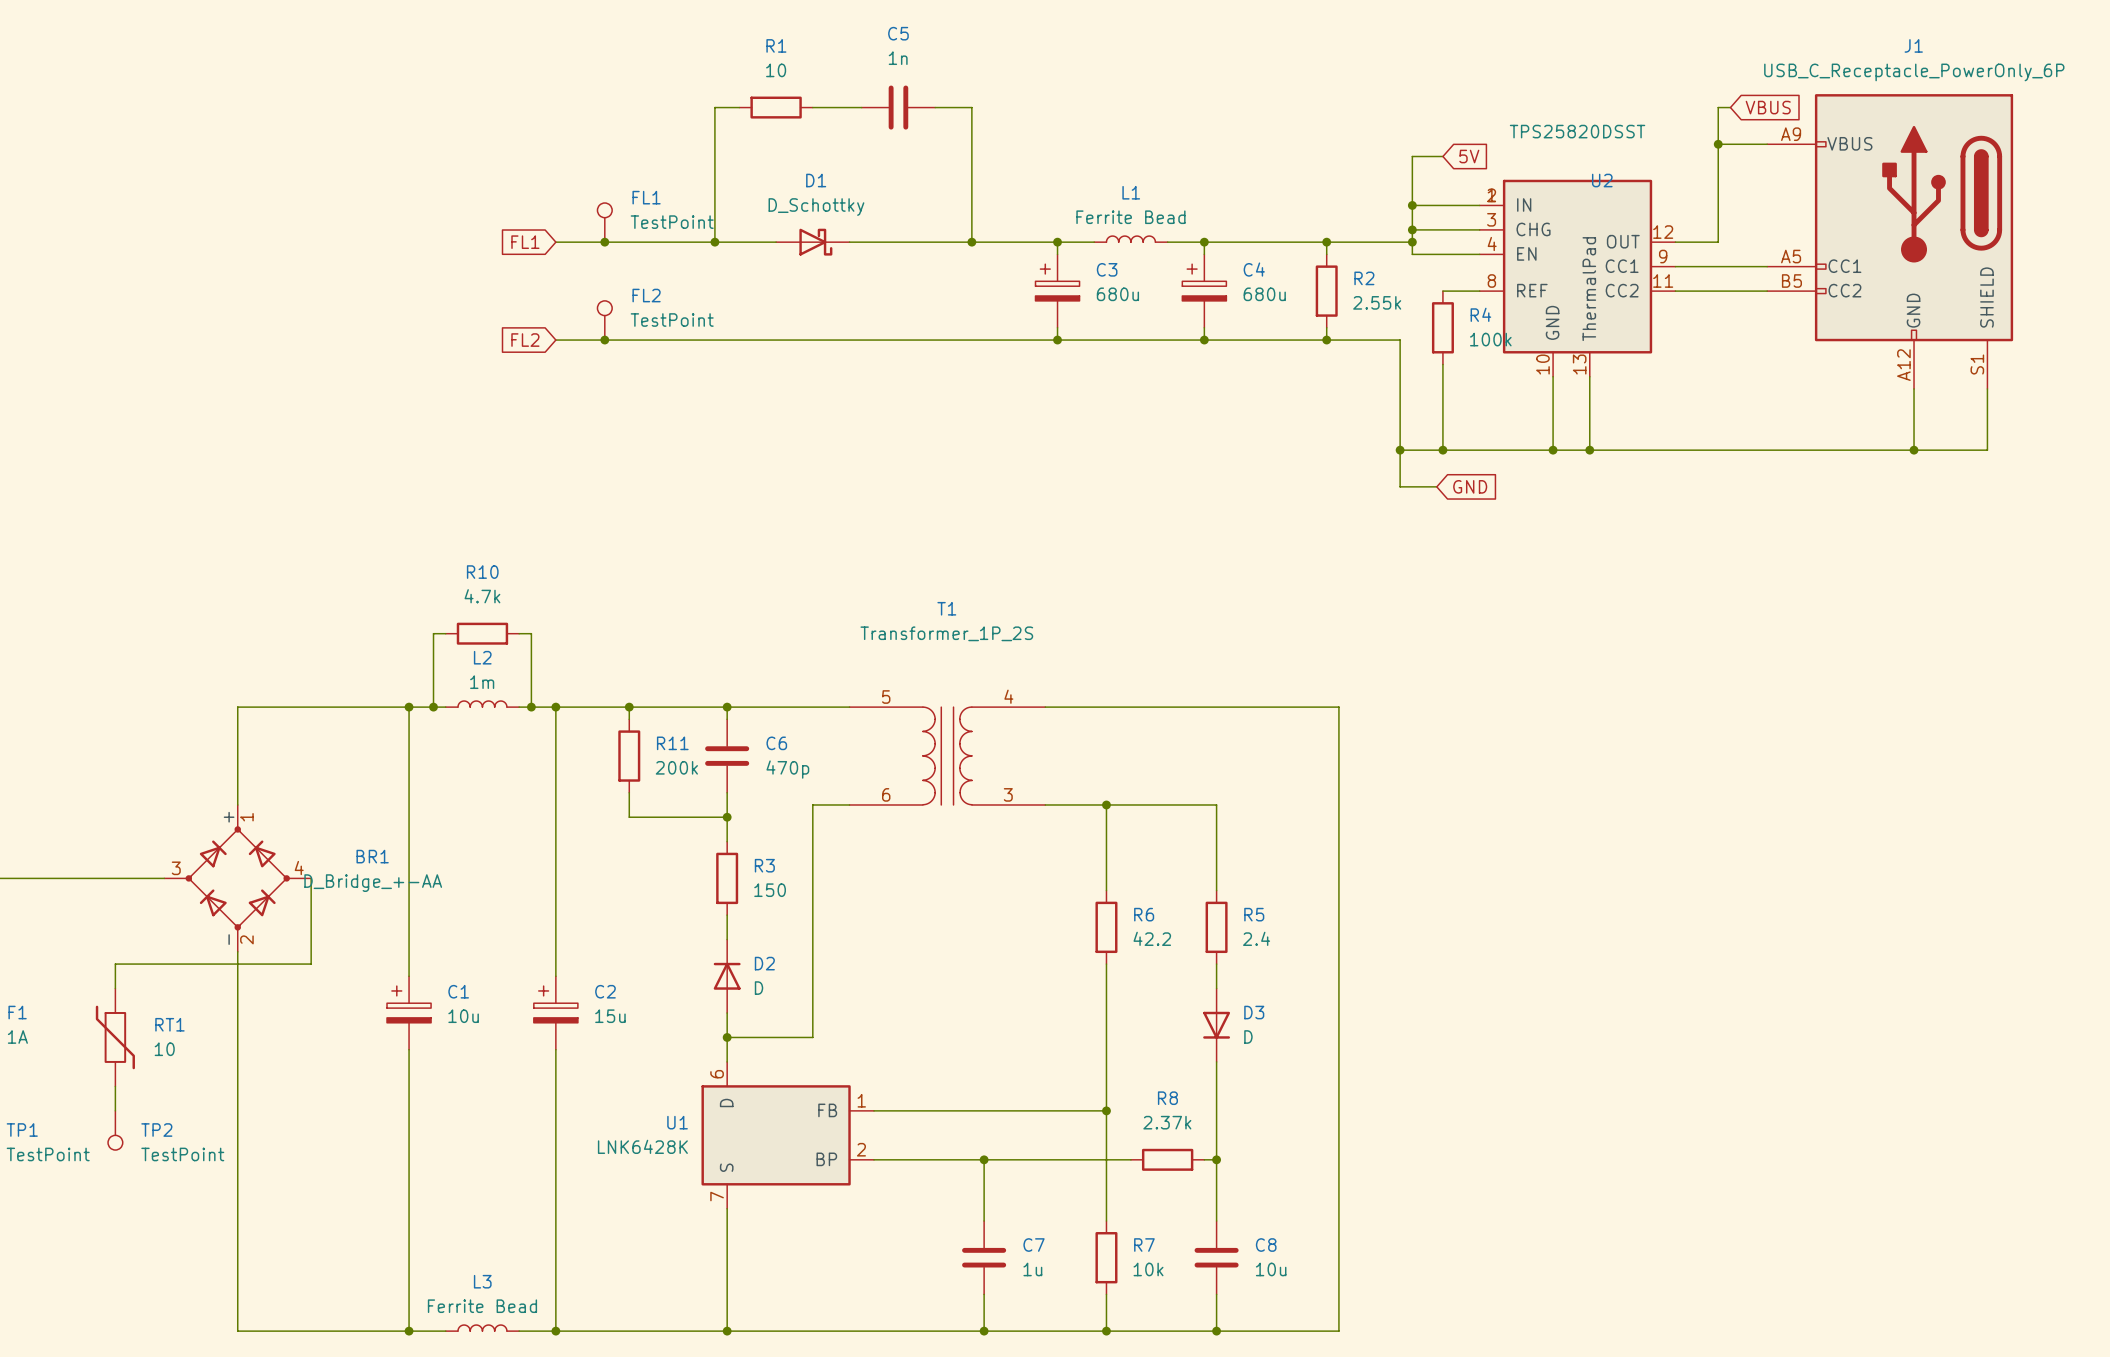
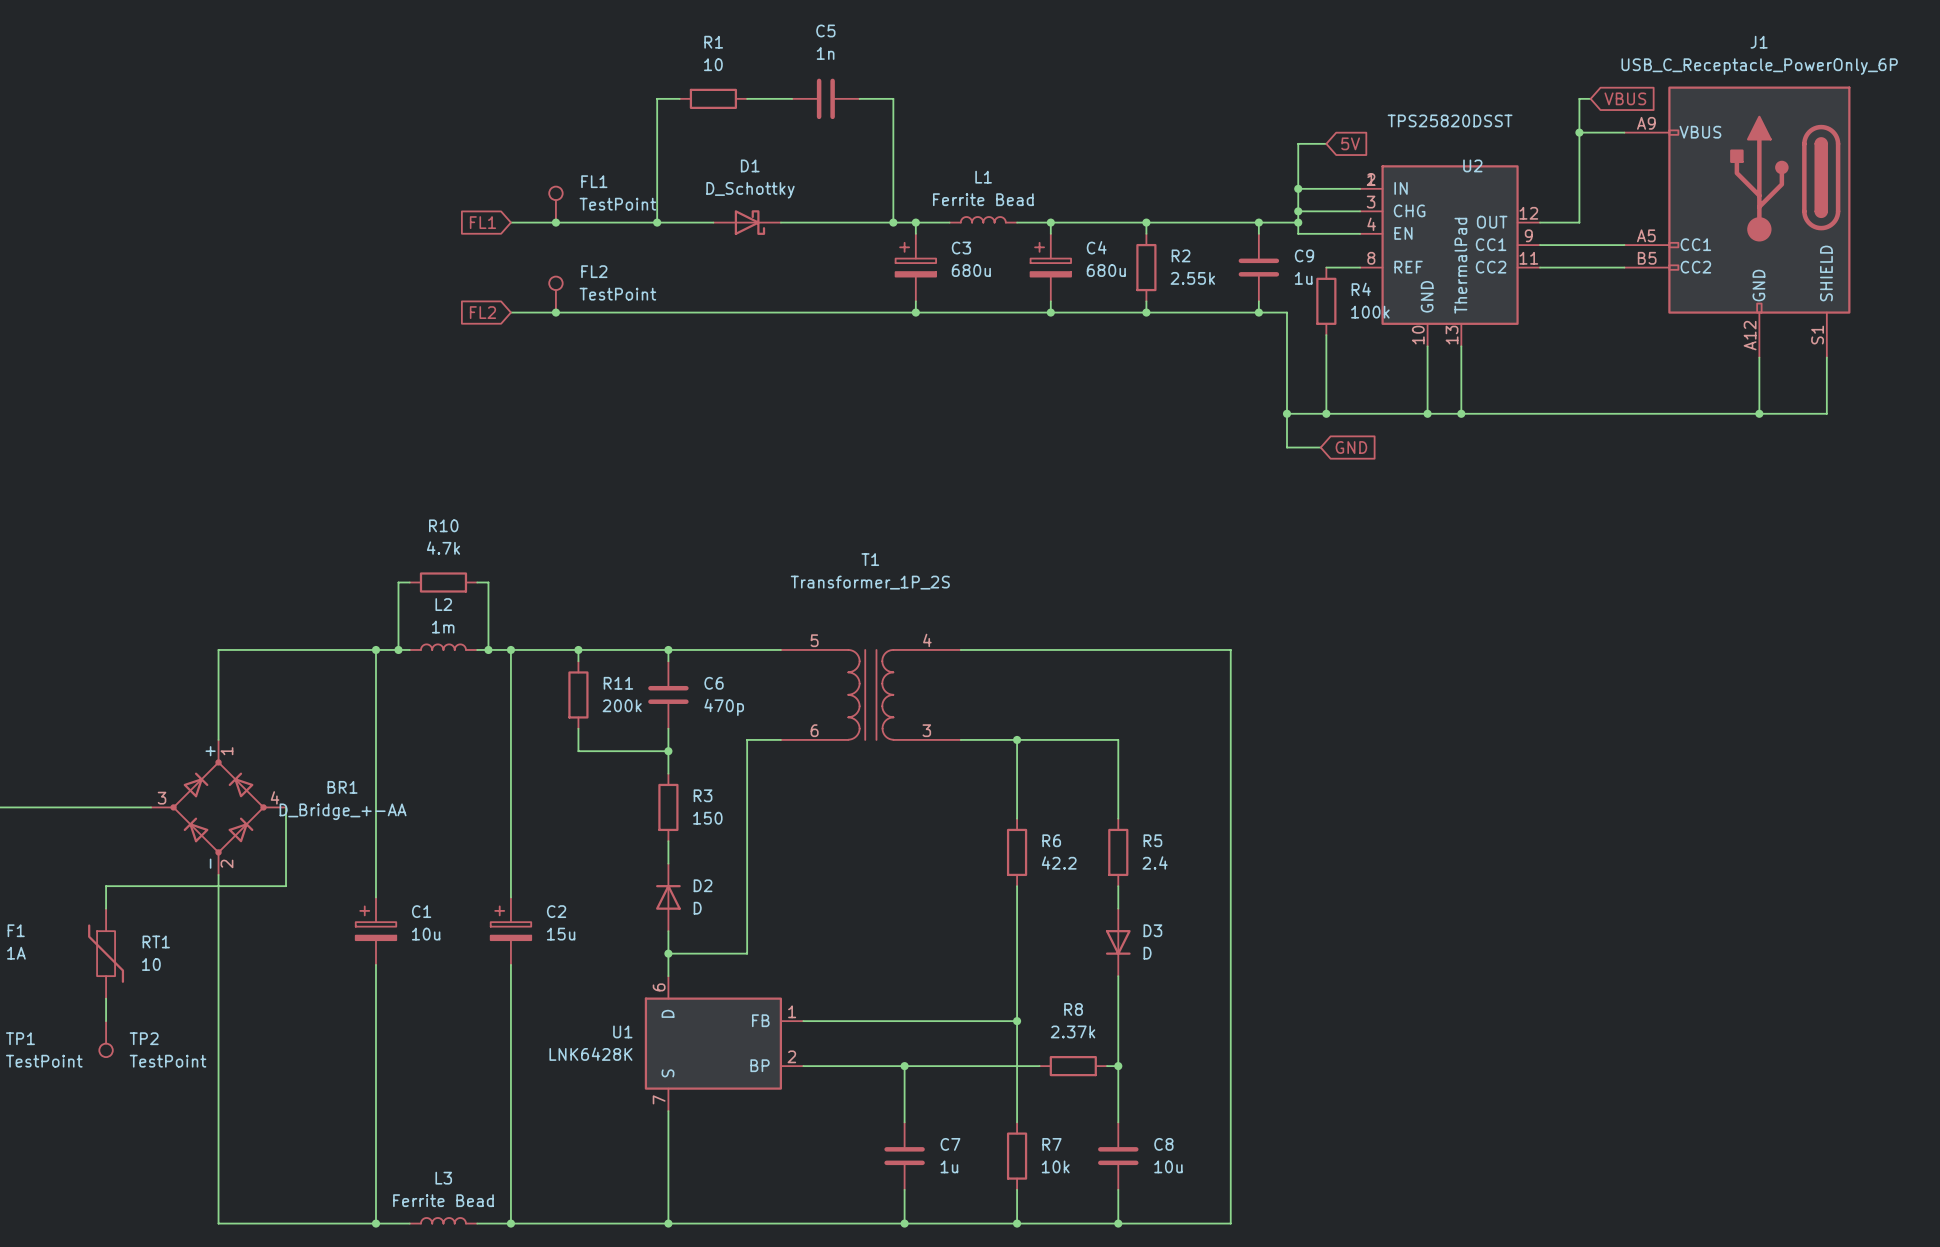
L1 position: (1130, 239) -> (983, 219)
junction: none -> (915, 222)
wire: (1033, 242) (1094, 242) -> (1017, 222) (1073, 222)
wire: (1057, 242) (1057, 254) -> (915, 222) (915, 233)
junction: (1057, 242) -> none
wire: none -> (1050, 222) (1050, 233)
junction: none -> (1050, 222)
wire: (1204, 242) (1204, 254) -> (1146, 222) (1146, 233)
junction: (1204, 242) -> none
junction: none -> (1146, 222)
wire: (1326, 242) (1326, 254) -> (1258, 222) (1258, 233)
junction: (1326, 242) -> none
junction: none -> (1258, 222)
C3 position: (1057, 291) -> (915, 267)
C4 position: (1204, 291) -> (1050, 267)
R2 position: (1326, 291) -> (1146, 267)
C9: none -> 1u (1258, 267)
wire: (1057, 327) (1057, 340) -> (915, 301) (915, 312)
wire: none -> (1050, 301) (1050, 312)
wire: (1204, 327) (1204, 340) -> (1146, 301) (1146, 312)
wire: (1326, 327) (1326, 340) -> (1258, 301) (1258, 312)
junction: none -> (915, 312)
junction: (1057, 340) -> none
junction: none -> (1050, 312)
junction: (1204, 340) -> none
junction: none -> (1146, 312)
junction: (1326, 340) -> none
junction: none -> (1258, 312)

